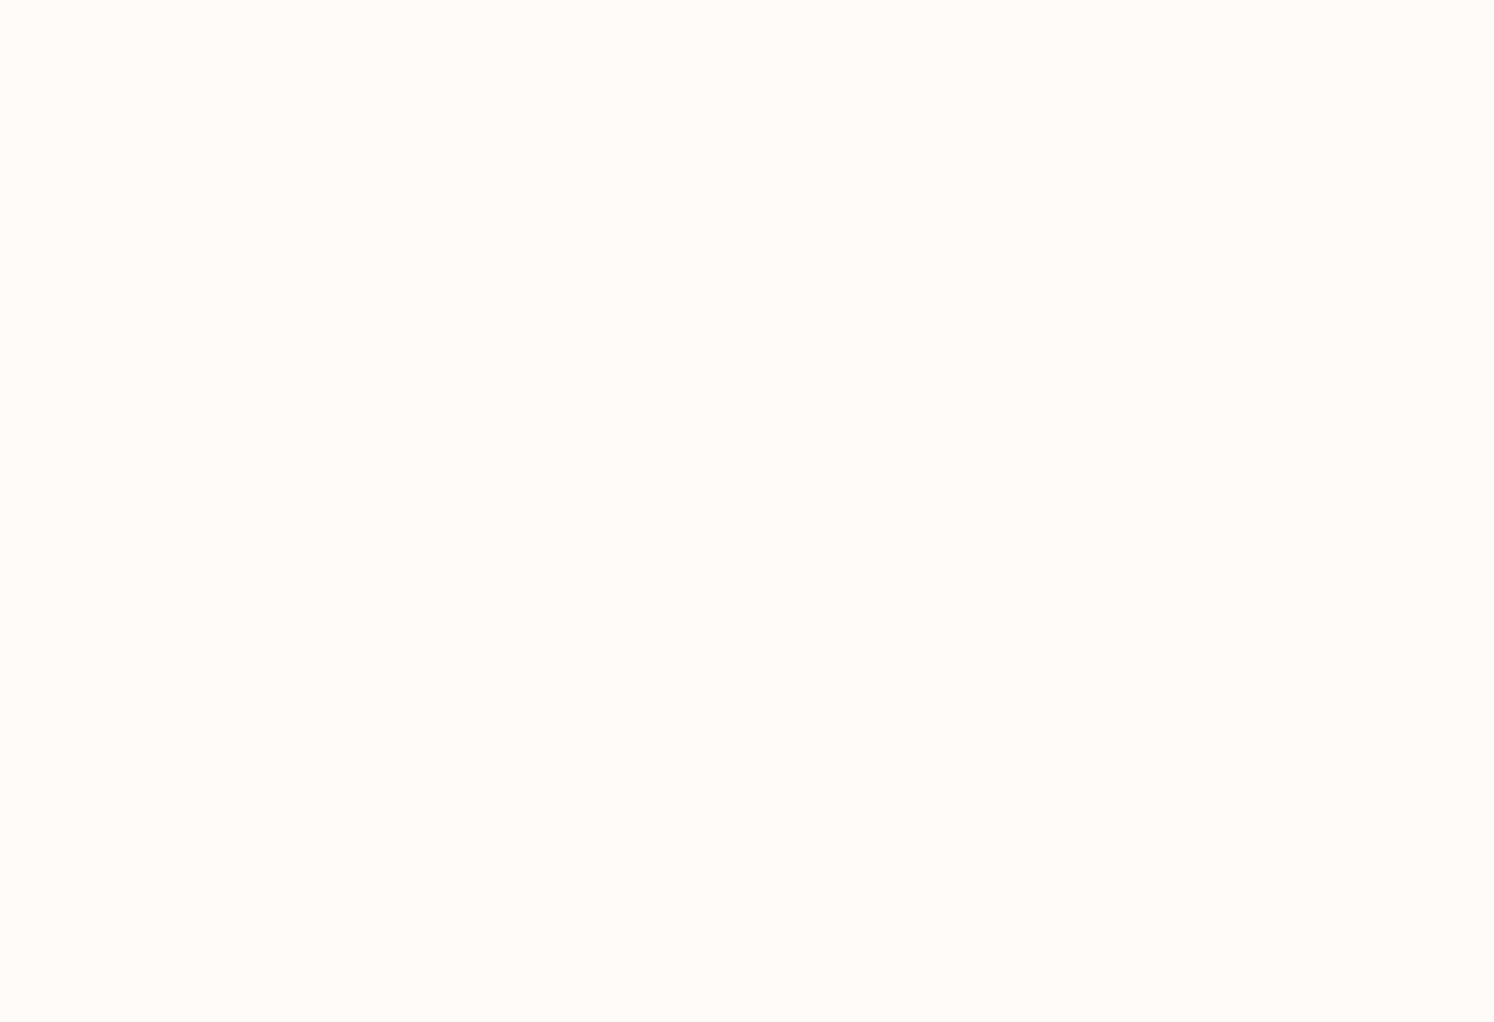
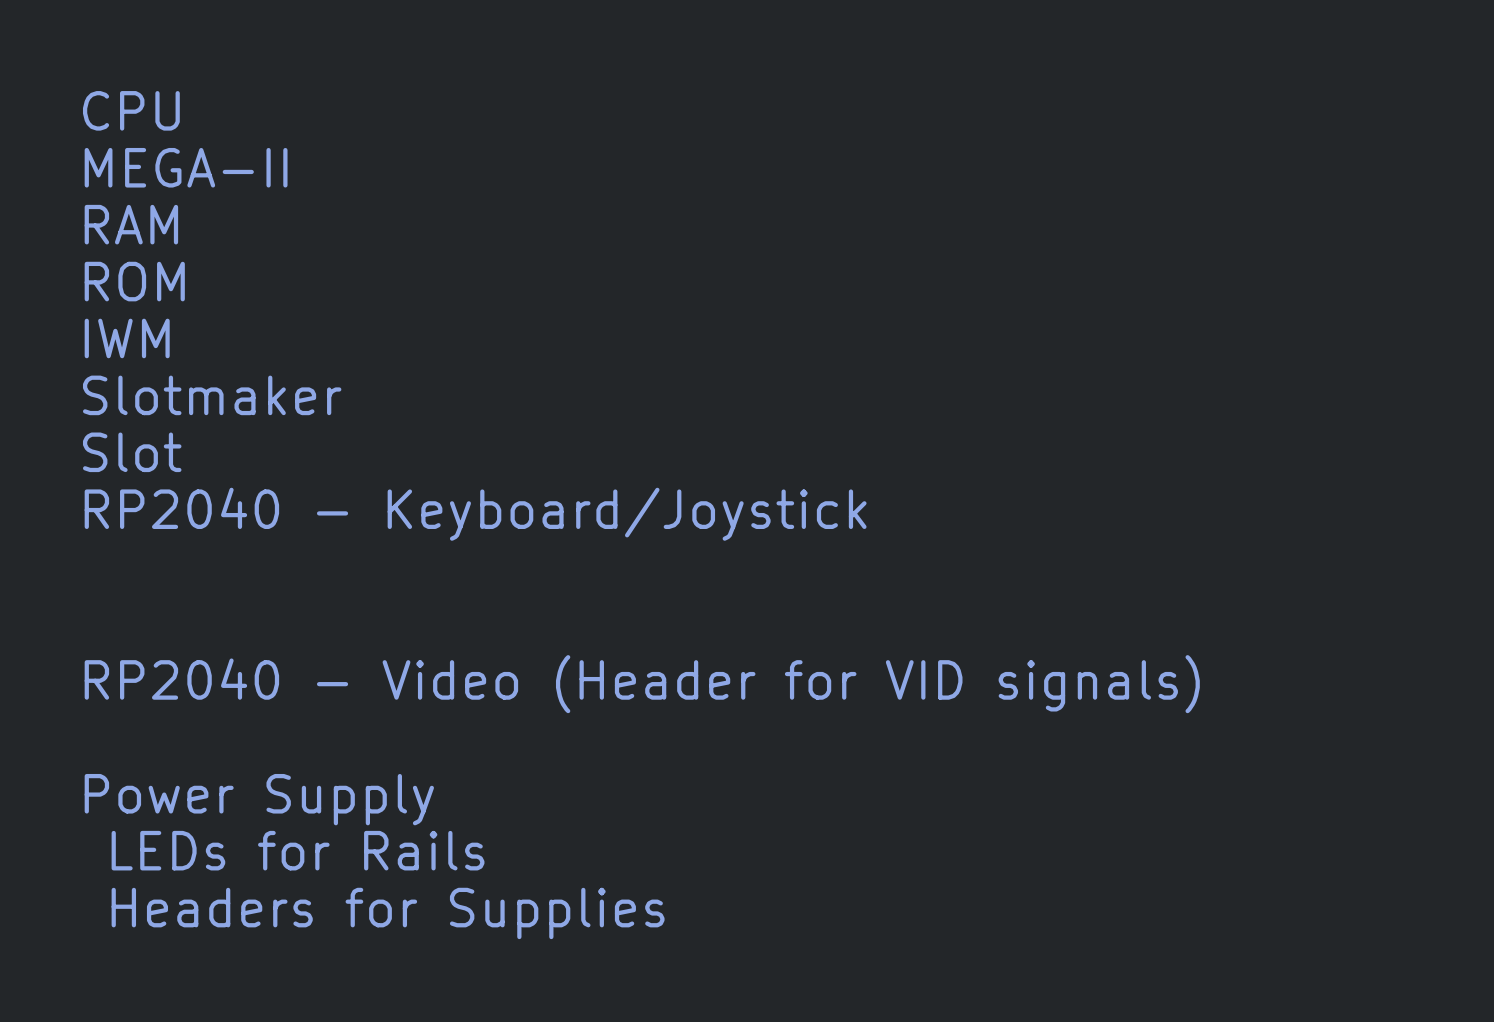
text: none -> CPU (131, 110)
text: none -> MEGA-II (186, 167)
text: none -> RAM (131, 224)
text: none -> ROM (134, 281)
text: none -> IWM (127, 338)
text: none -> Slotmaker (212, 395)
text: none -> Slot (132, 452)
text: none -> RP2040 - Keyboard/Joystick (475, 514)
text: none -> RP2040 - Video (Header for VID signals) (642, 684)
text: none -> Power Supply (259, 799)
text: none -> LEDs for Rails (298, 850)
text: none -> Headers for Supplies (388, 913)

